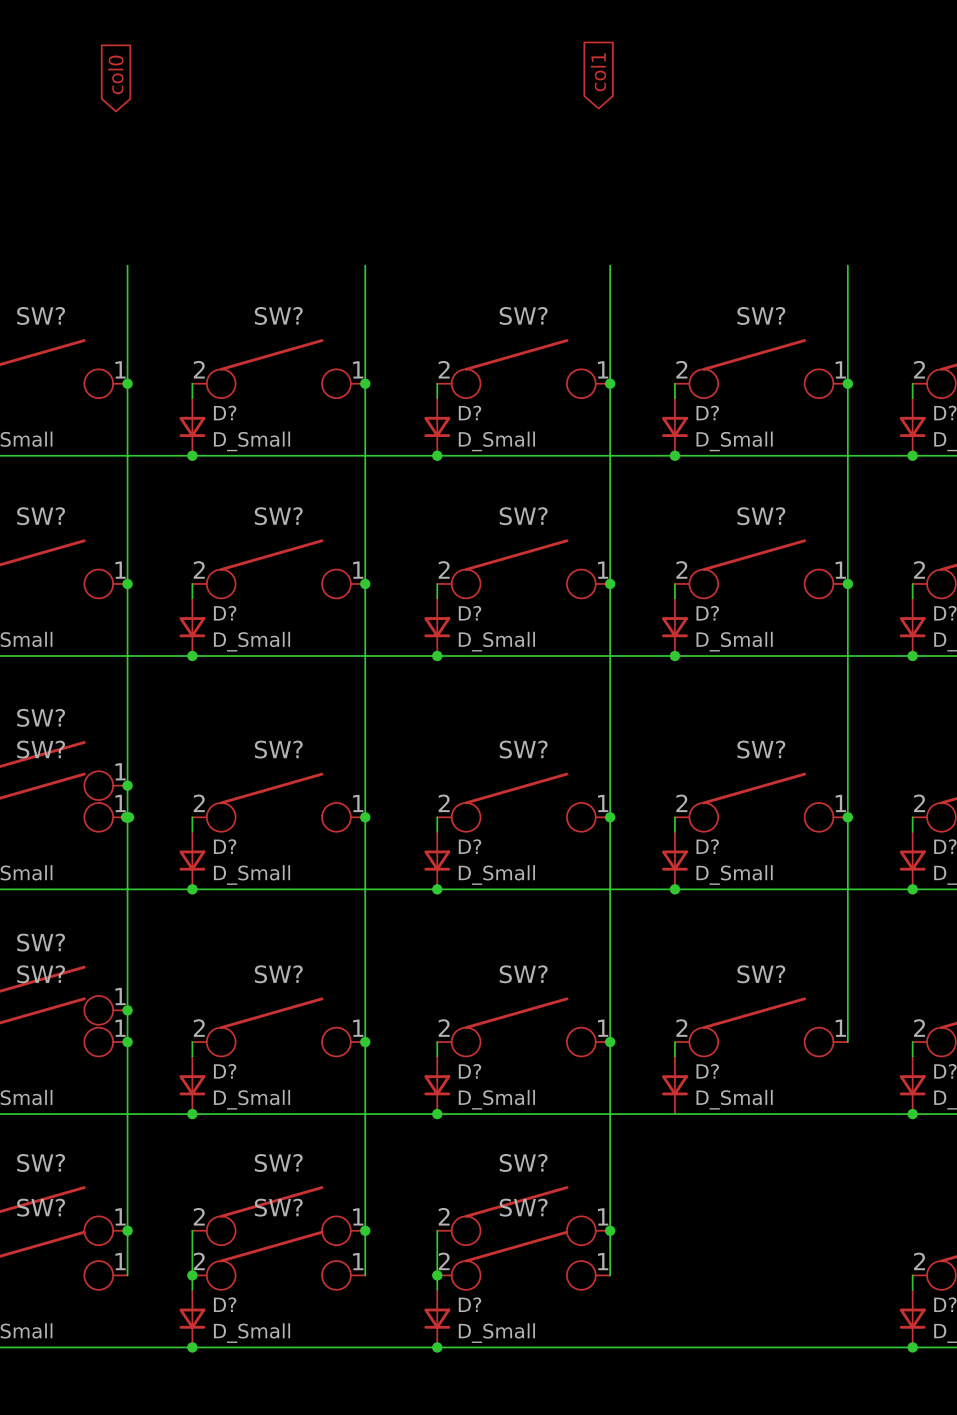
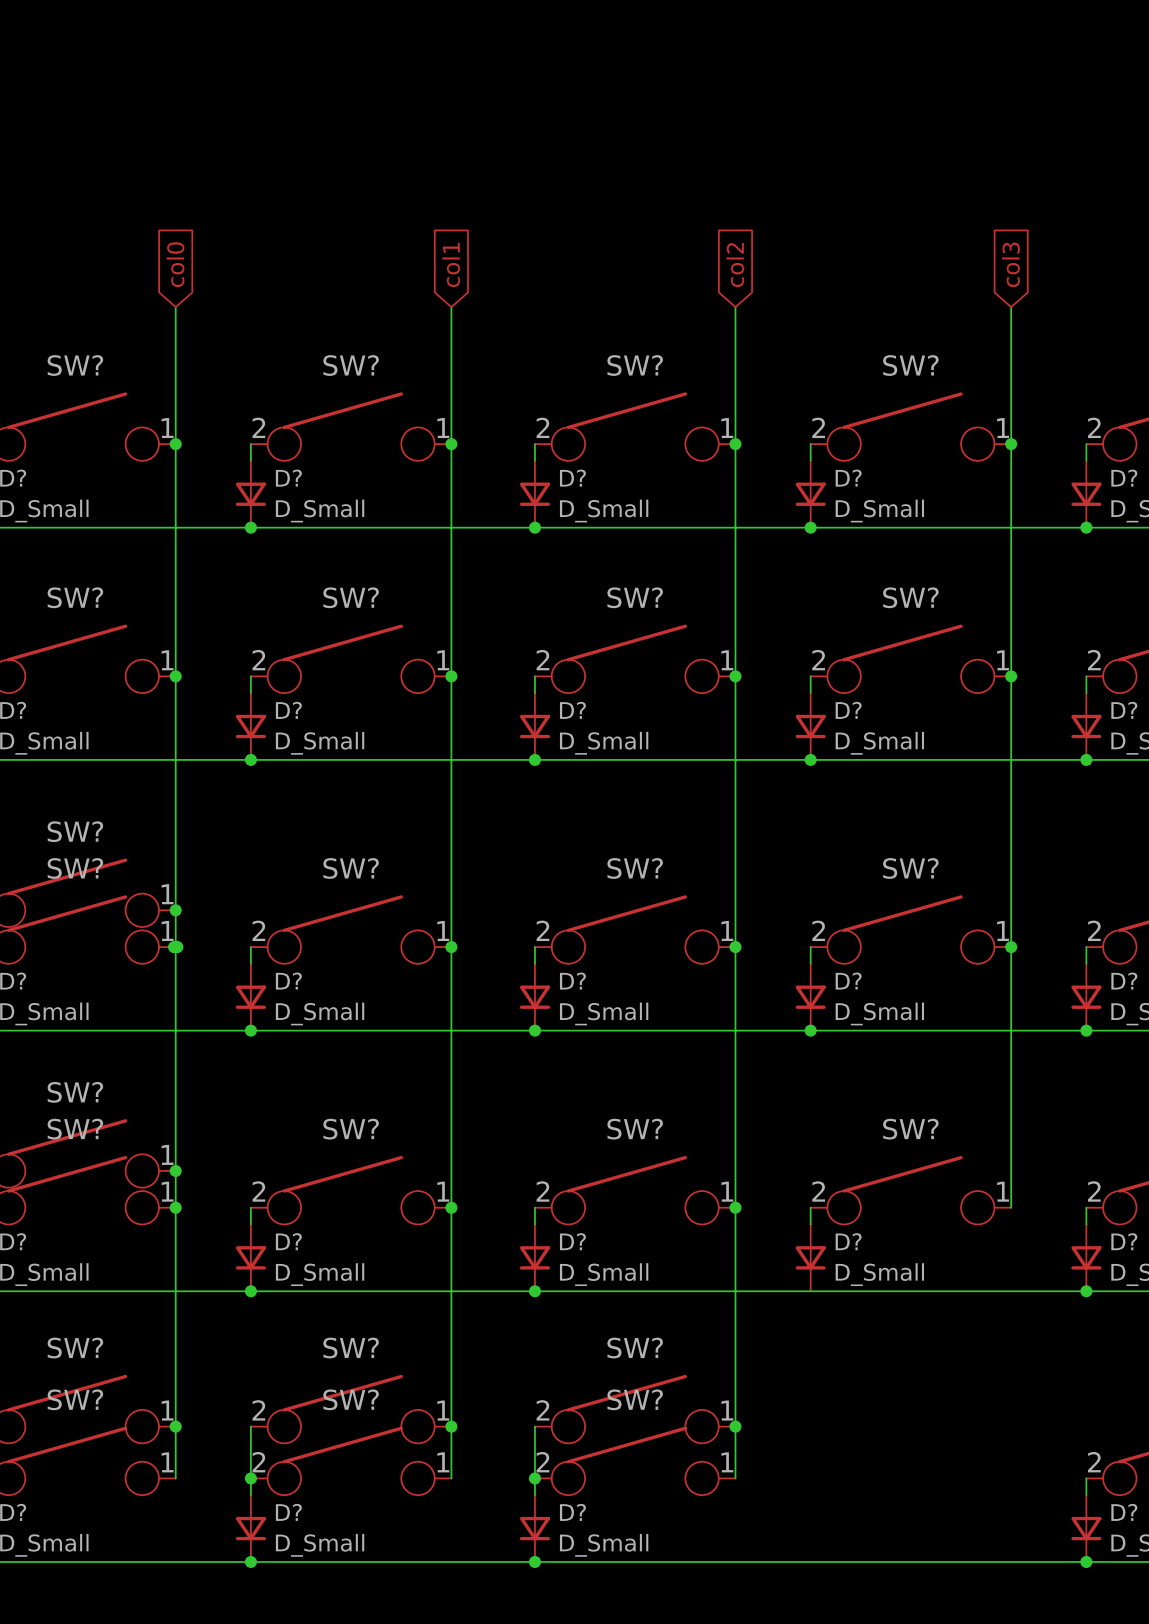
global label position: col1 (598, 72) -> col1 (451, 264)
global label position: col0 (115, 74) -> col0 (175, 264)
global label: none -> col2 (735, 265)
global label: none -> col3 (1010, 264)

